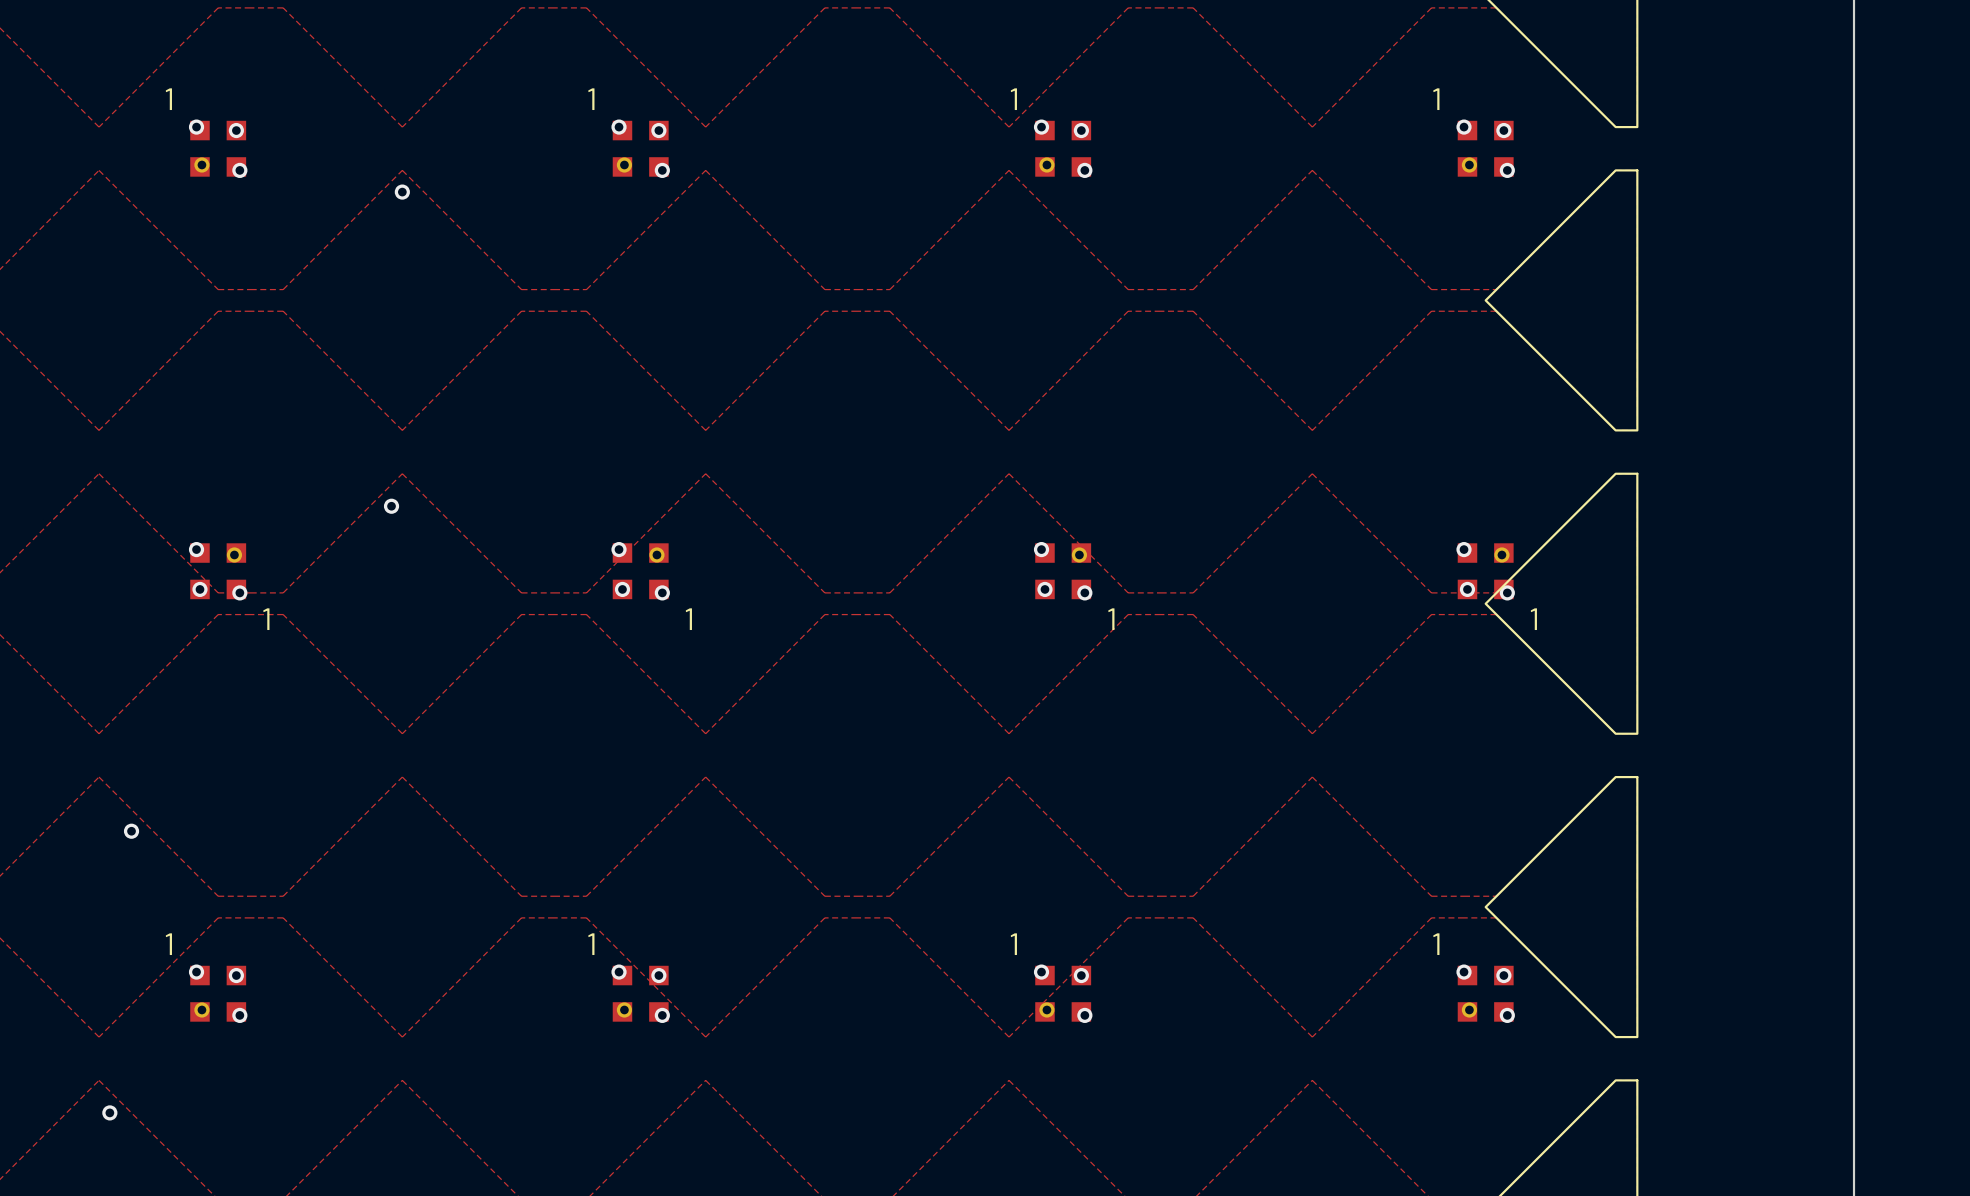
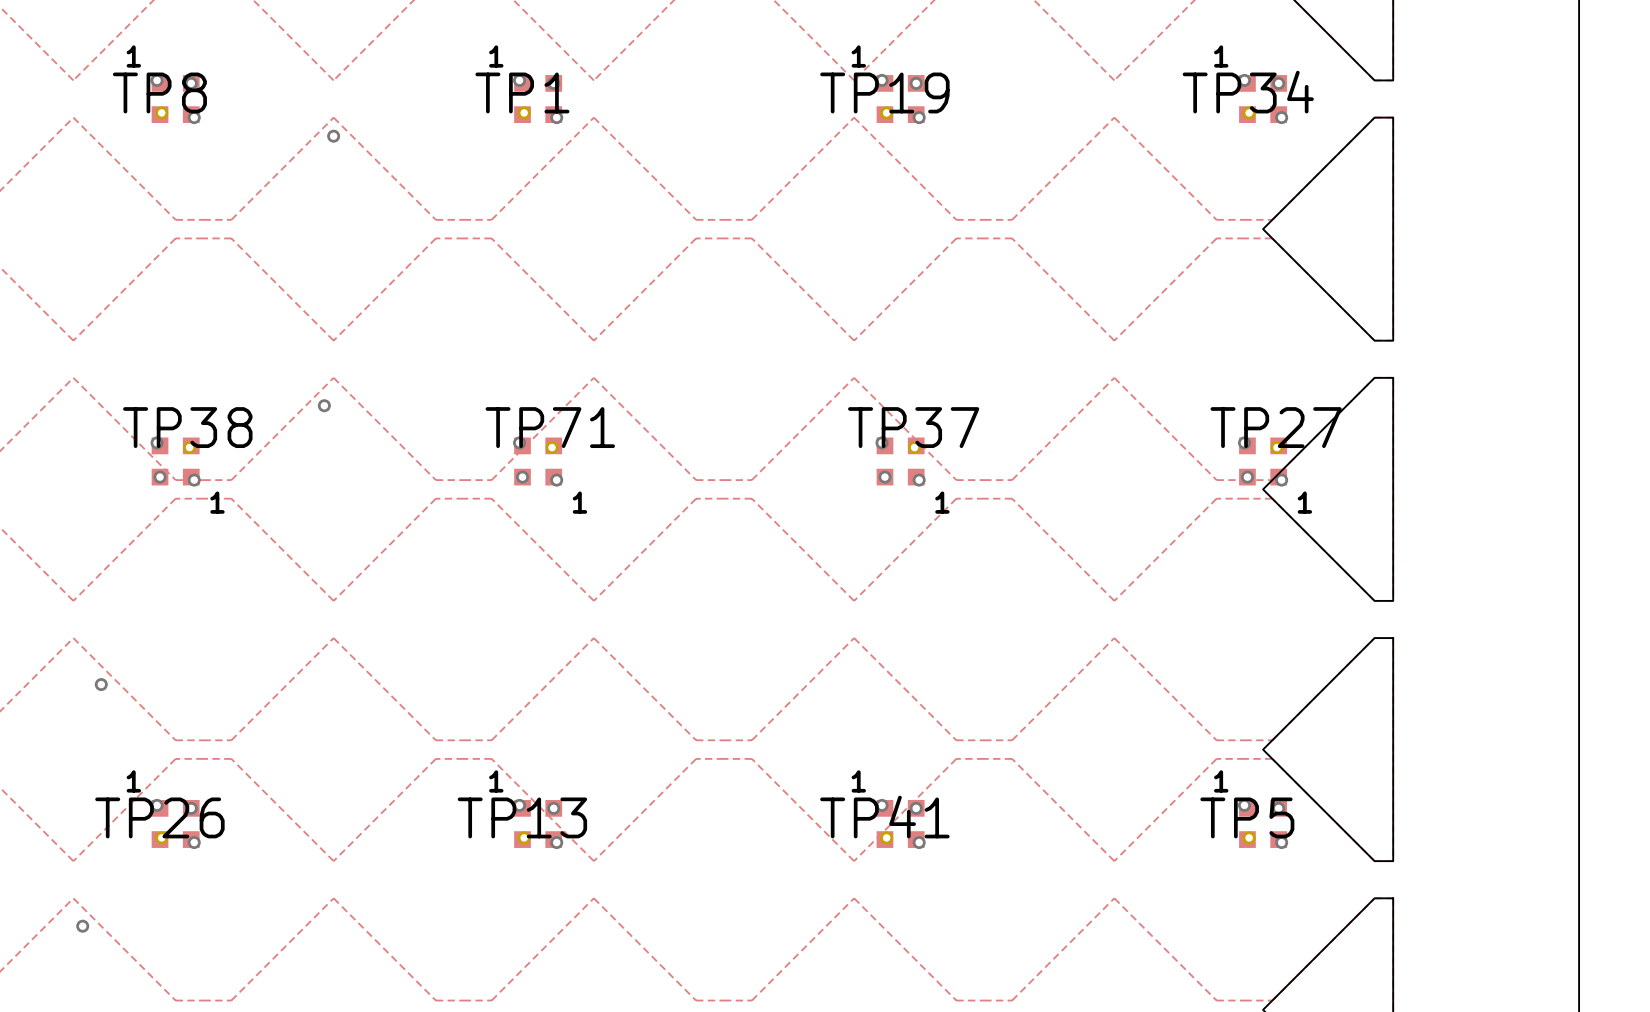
TP8 name: none -> TP8 (159, 92)
TP1 name: none -> TP1 (522, 92)
TP19 name: none -> TP19 (884, 92)
TP34 name: none -> TP34 (1248, 92)
TP38 name: none -> TP38 (187, 427)
TP71 name: none -> TP71 (550, 427)
TP37 name: none -> TP37 (913, 427)
TP27 name: none -> TP27 (1276, 427)
TP26 name: none -> TP26 (159, 817)
TP13 name: none -> TP13 (522, 817)
TP41 name: none -> TP41 (884, 817)
TP5 name: none -> TP5 (1247, 817)

